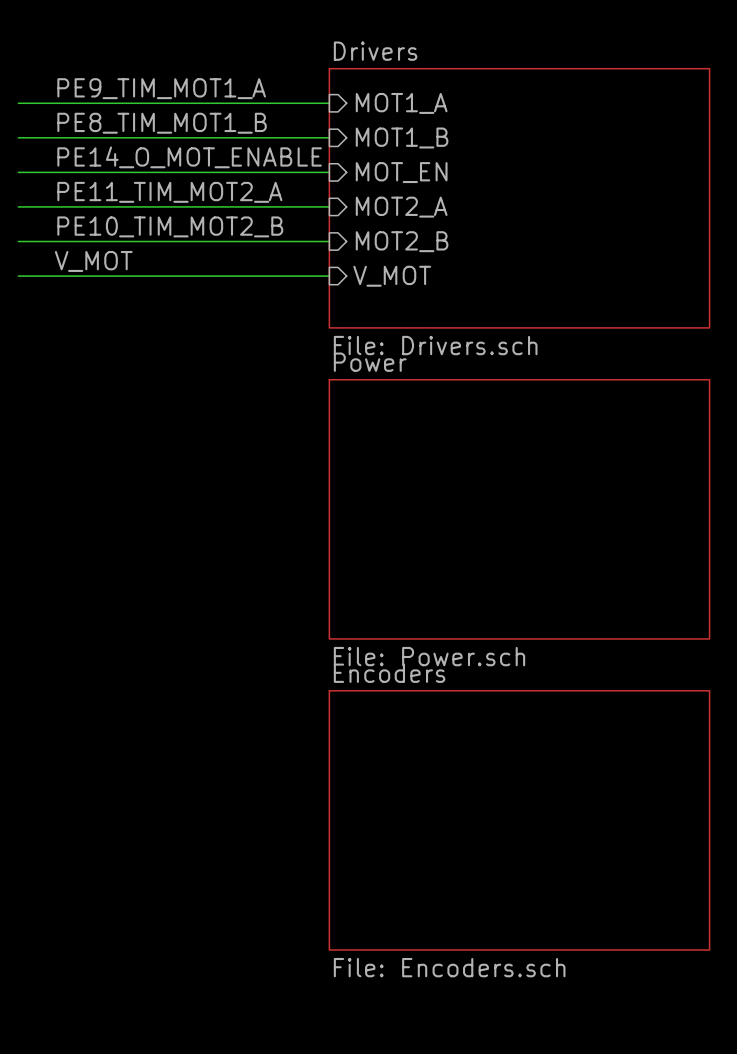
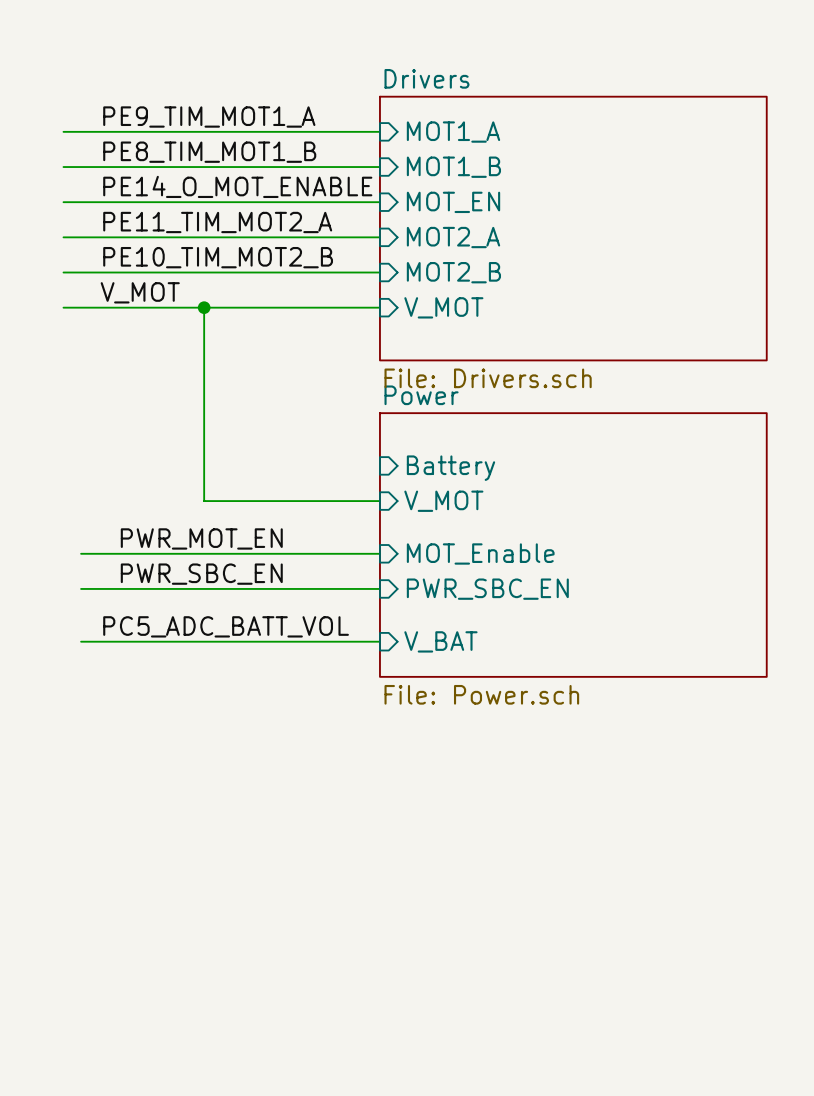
wire: none -> (204, 307) (204, 501) (379, 501)
junction: none -> (204, 307)
sheet pin: none -> Battery (450, 468)
sheet pin: none -> V_MOT (443, 501)
label: none -> PWR_MOT_EN (201, 538)
wire: none -> (81, 553) (379, 553)
sheet pin: none -> MOT_Enable (480, 553)
label: none -> PWR_SBC_EN (201, 574)
wire: none -> (81, 588) (379, 588)
sheet pin: none -> PWR_SBC_EN (487, 589)
label: none -> PC5_ADC_BATT_VOL (226, 626)
wire: none -> (81, 641) (379, 641)
sheet pin: none -> V_BAT (440, 641)
sheet Encoders: File: Encoders.sch (519, 820) -> none

